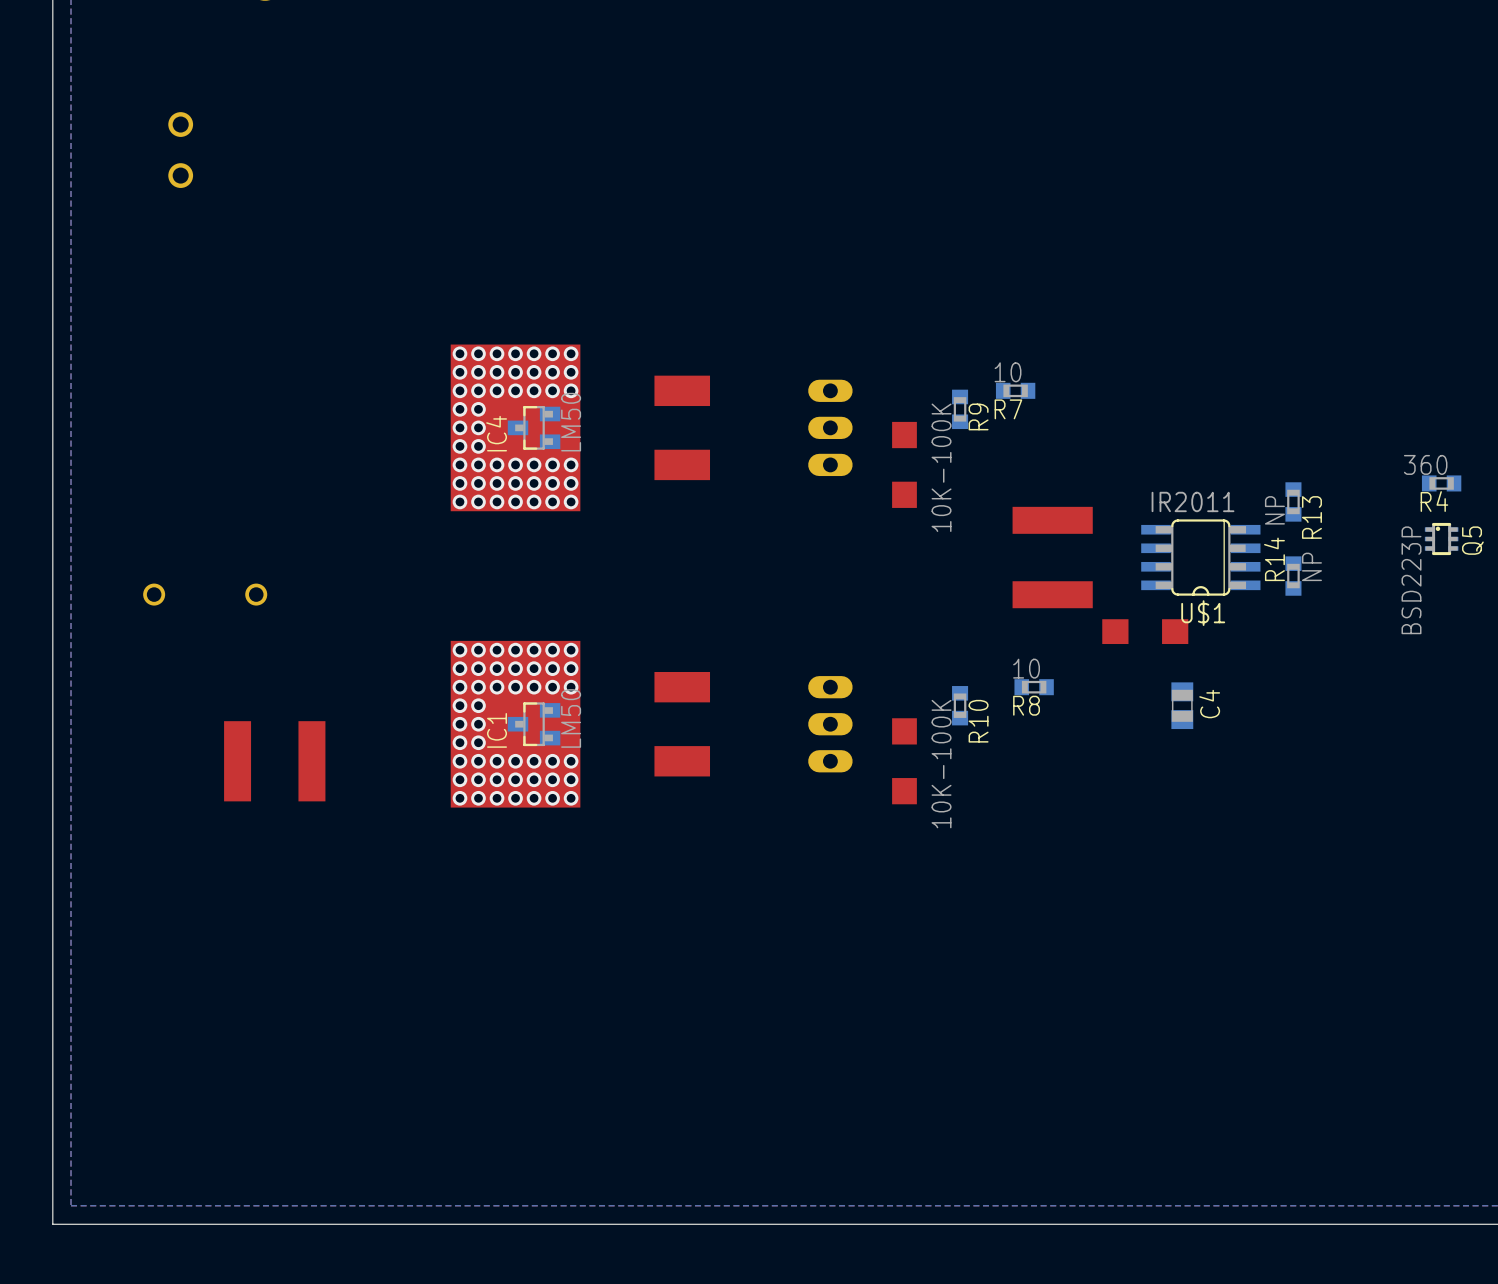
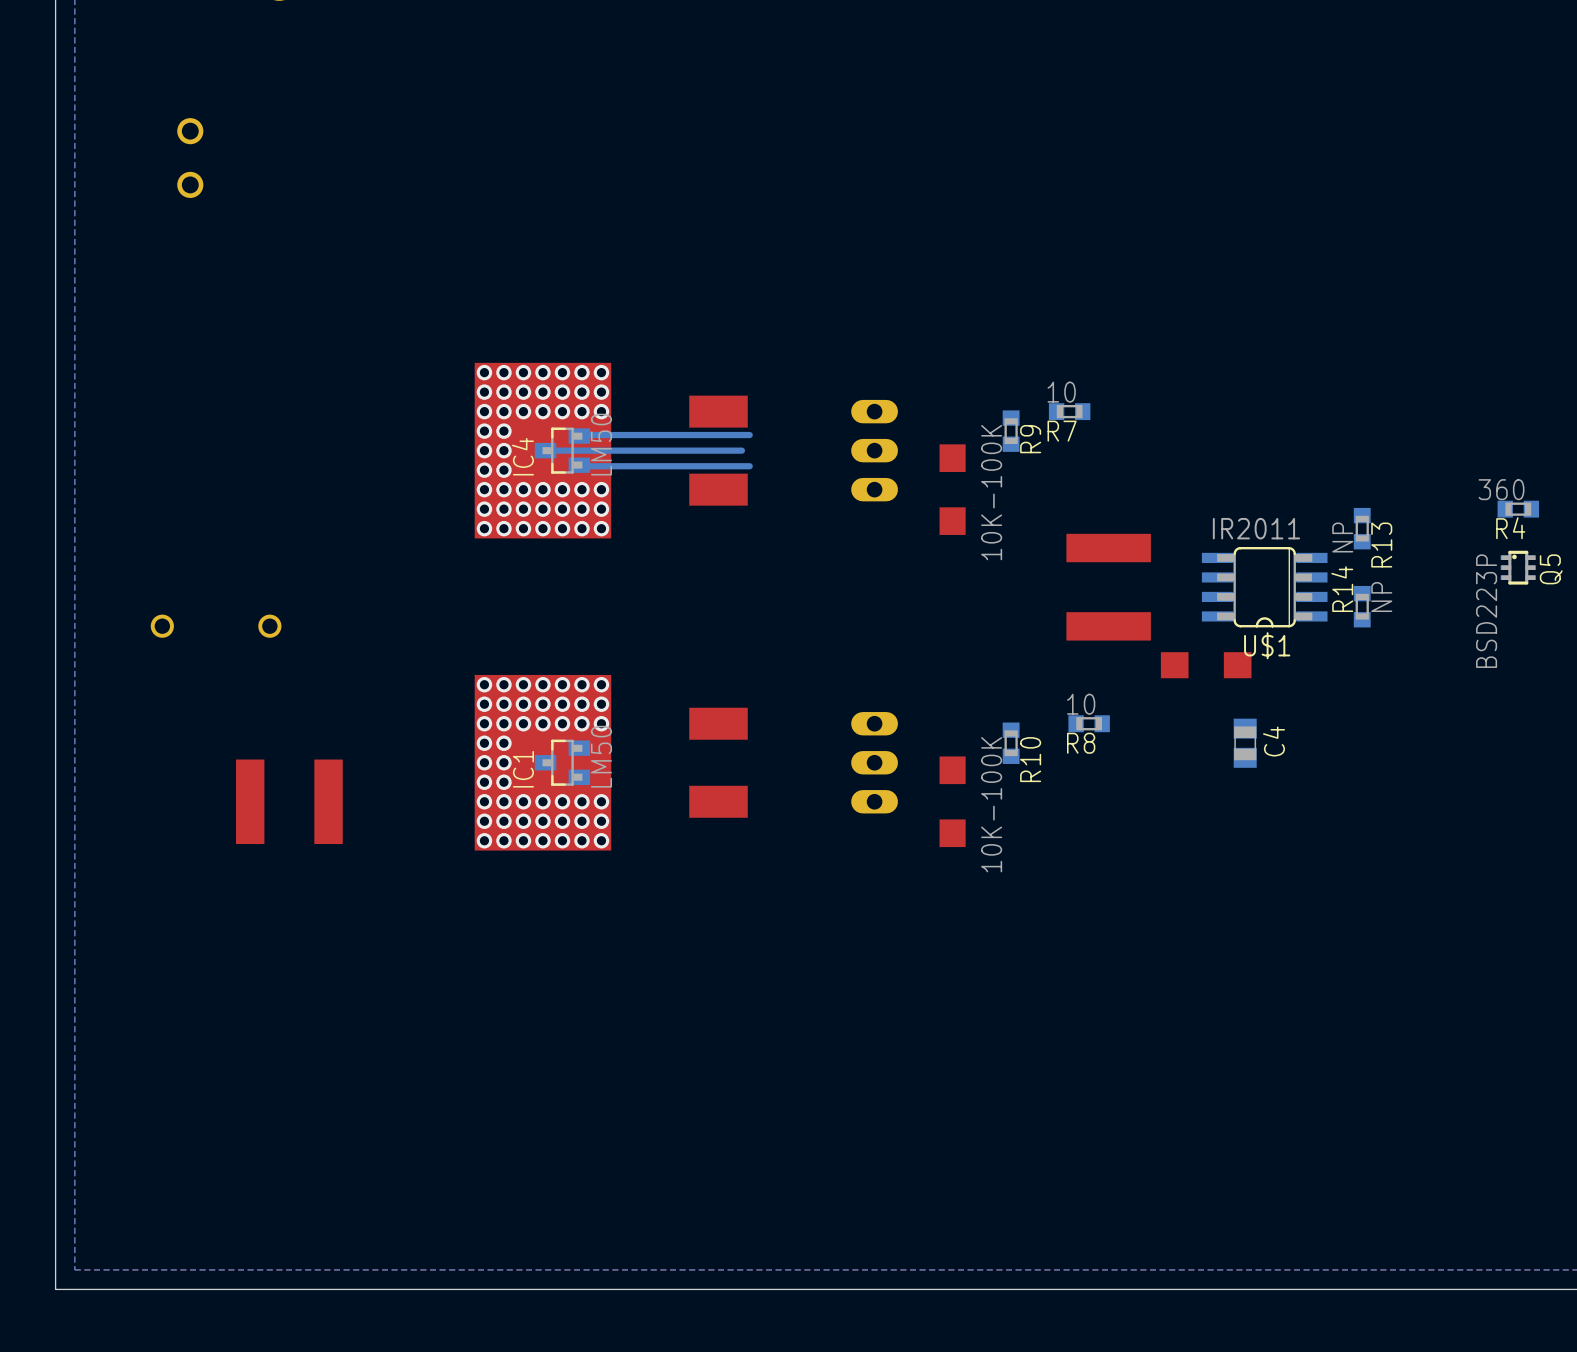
bottom track: none -> (749, 435) (579, 436)
bottom track: none -> (741, 450) (545, 450)
bottom track: none -> (579, 465) (749, 466)

